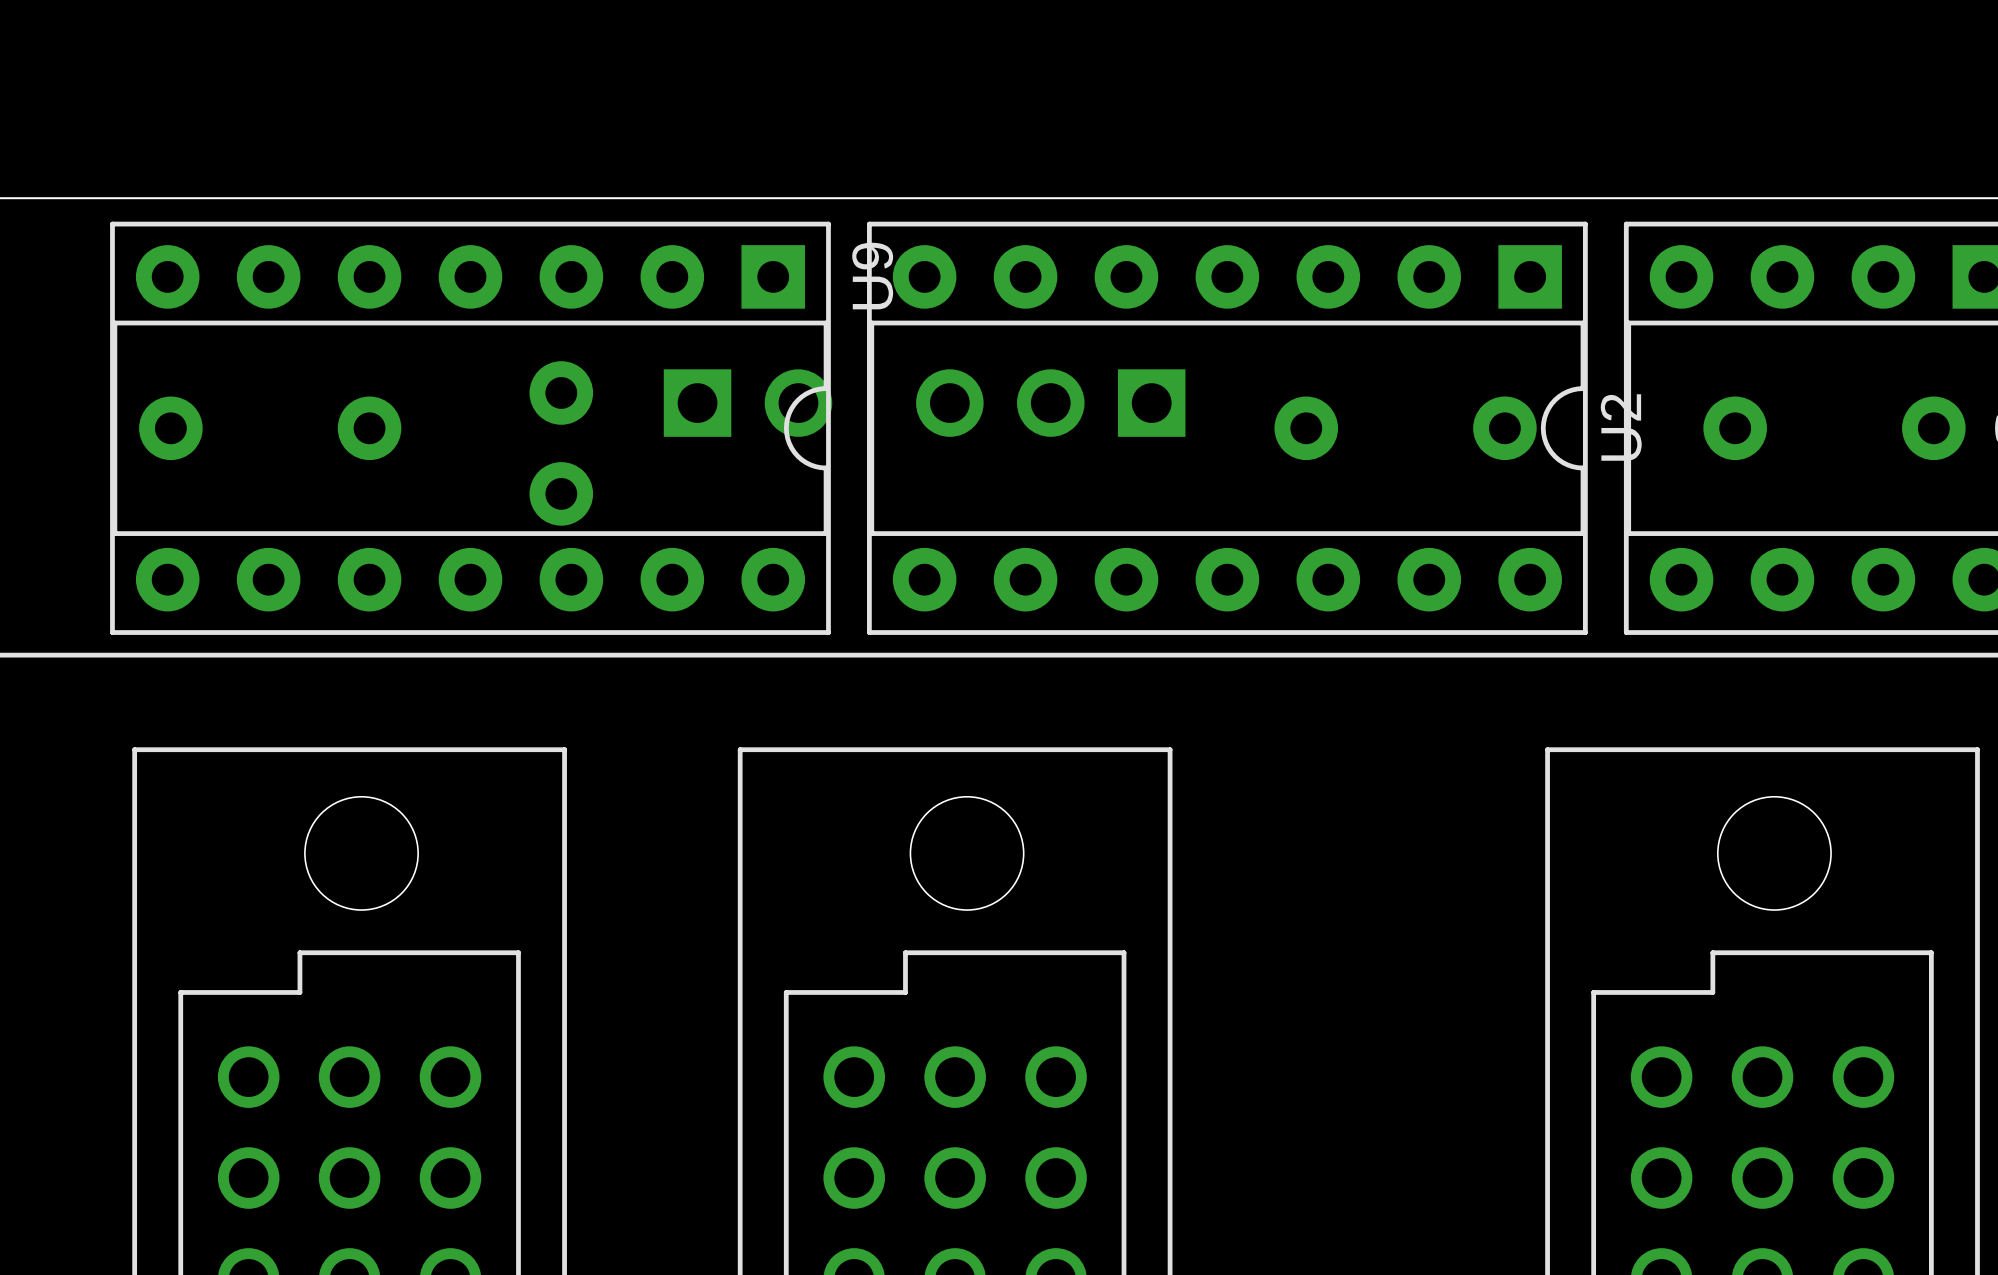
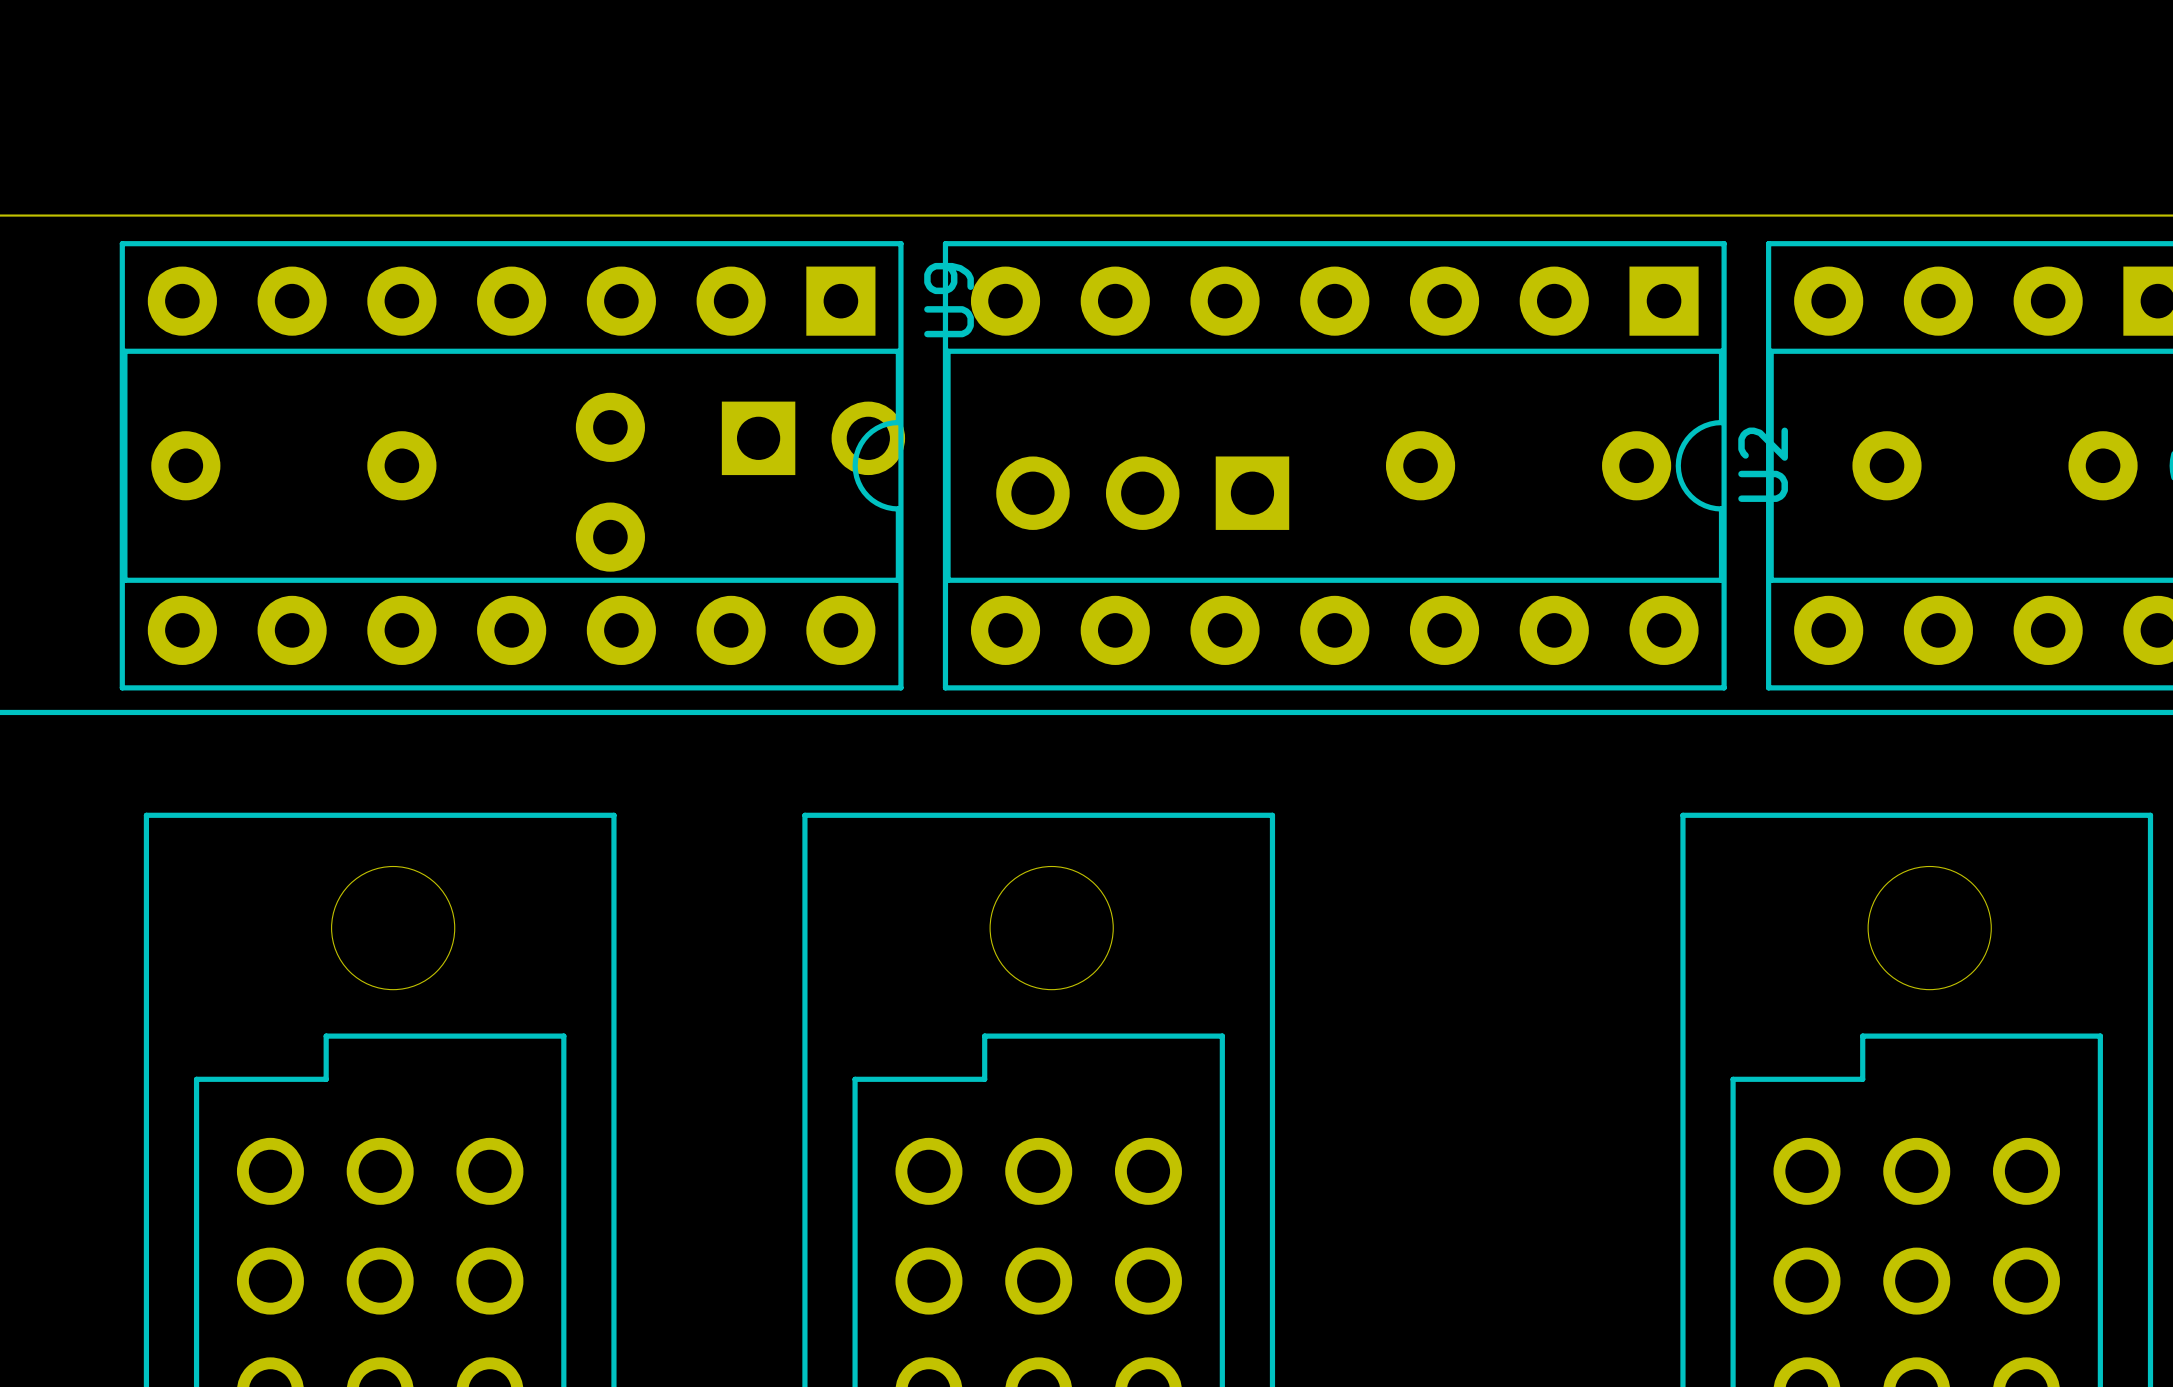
part position: (1050, 403) -> (1142, 493)

